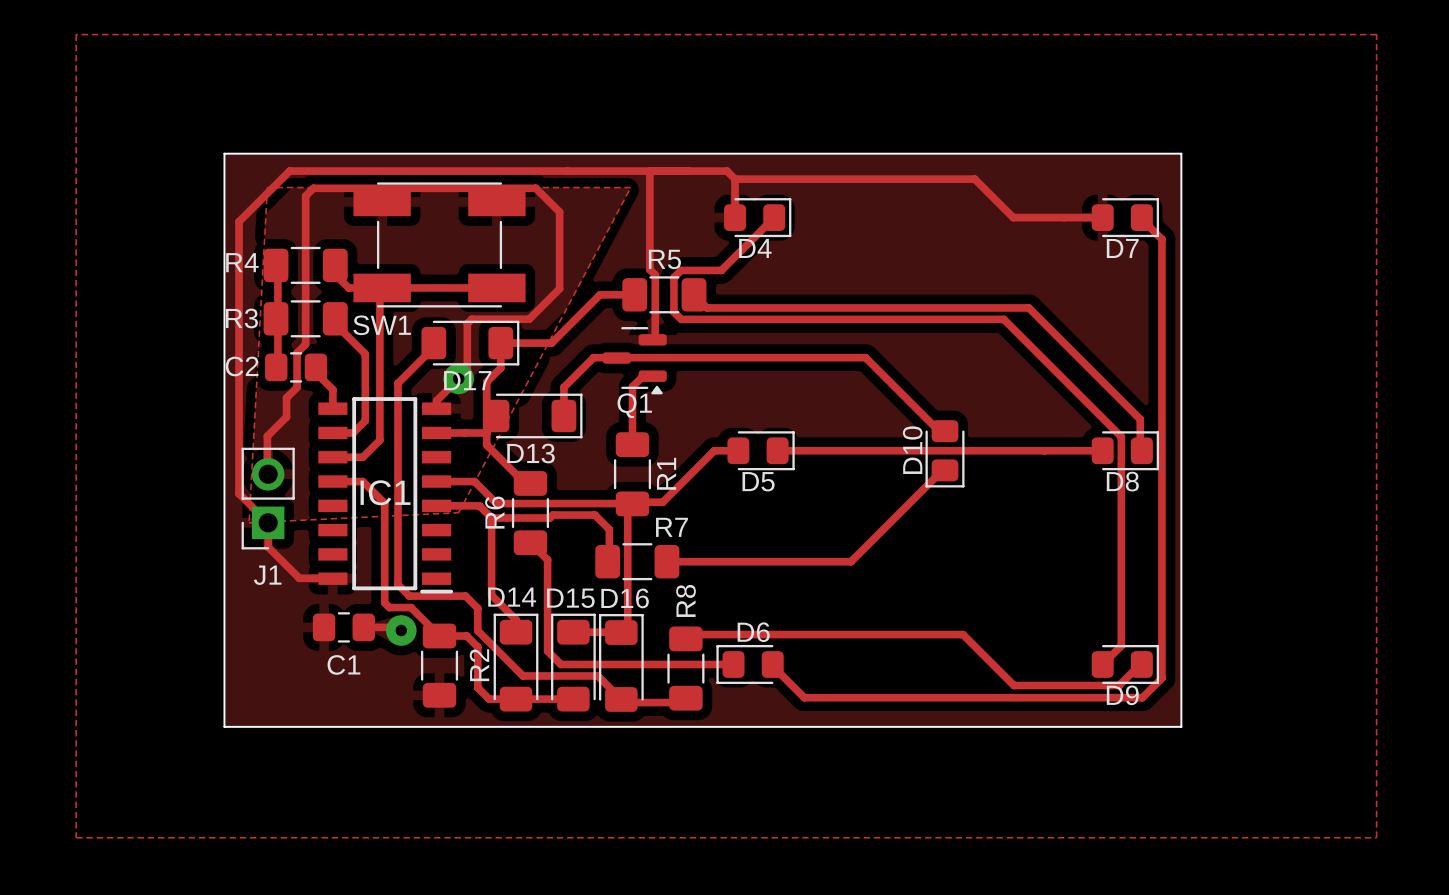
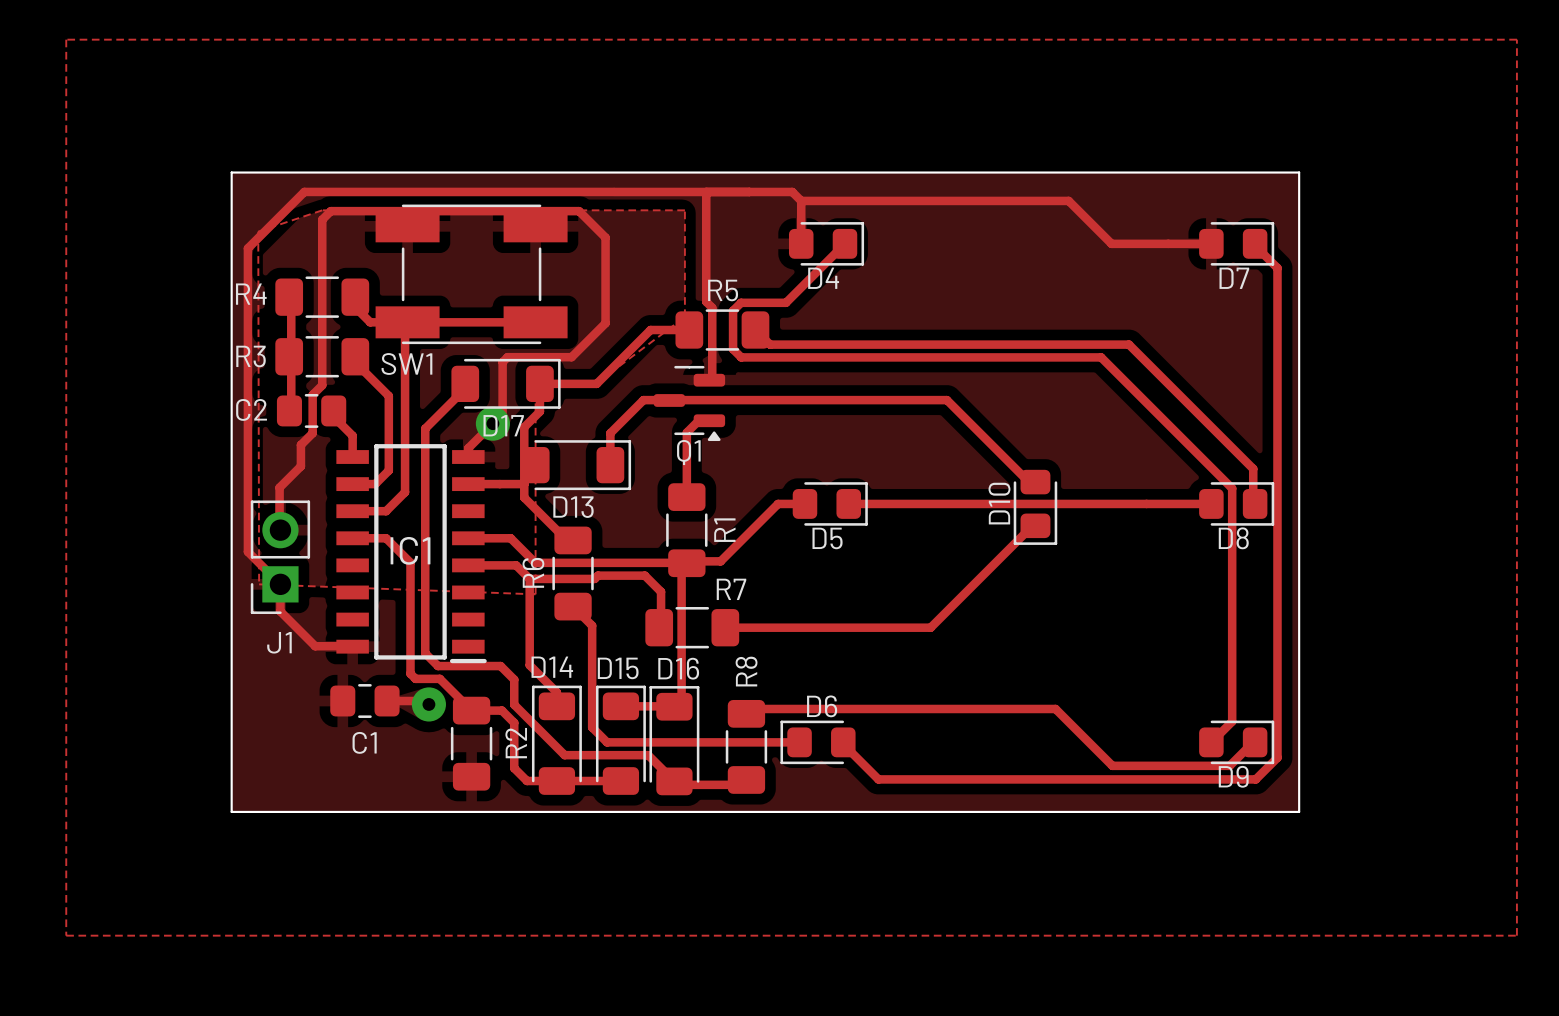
zone outline: (305, 187) (267, 187) (249, 522) (458, 512) (630, 187) -> (322, 210) (258, 231) (259, 584) (535, 594) (535, 381) (599, 381) (684, 317) (684, 210)

